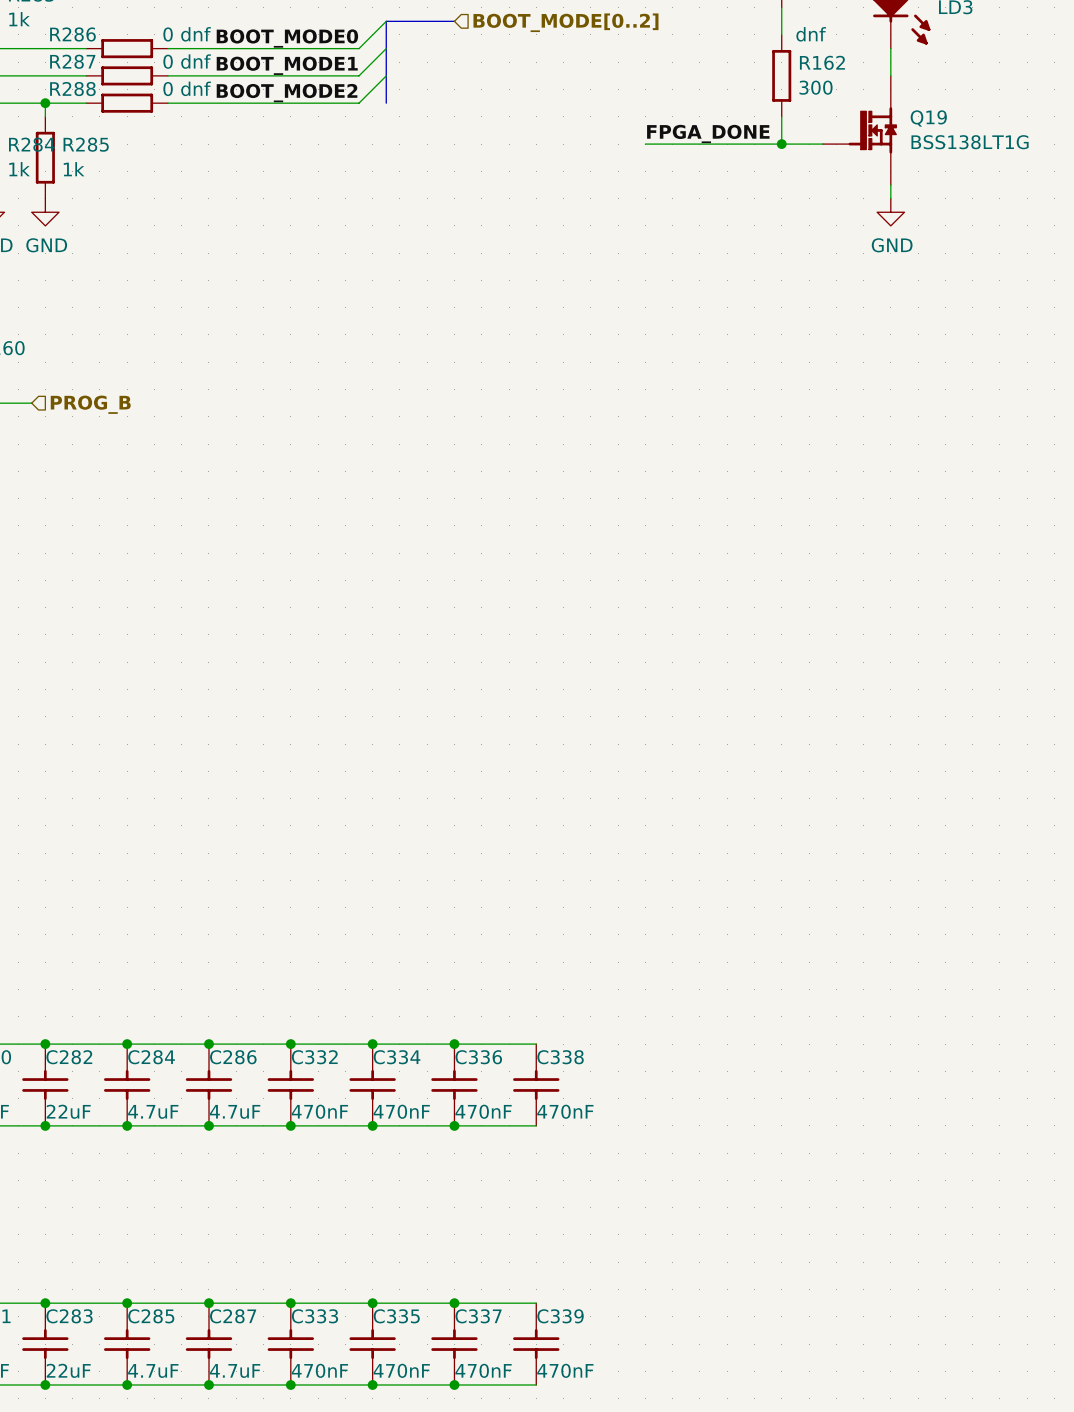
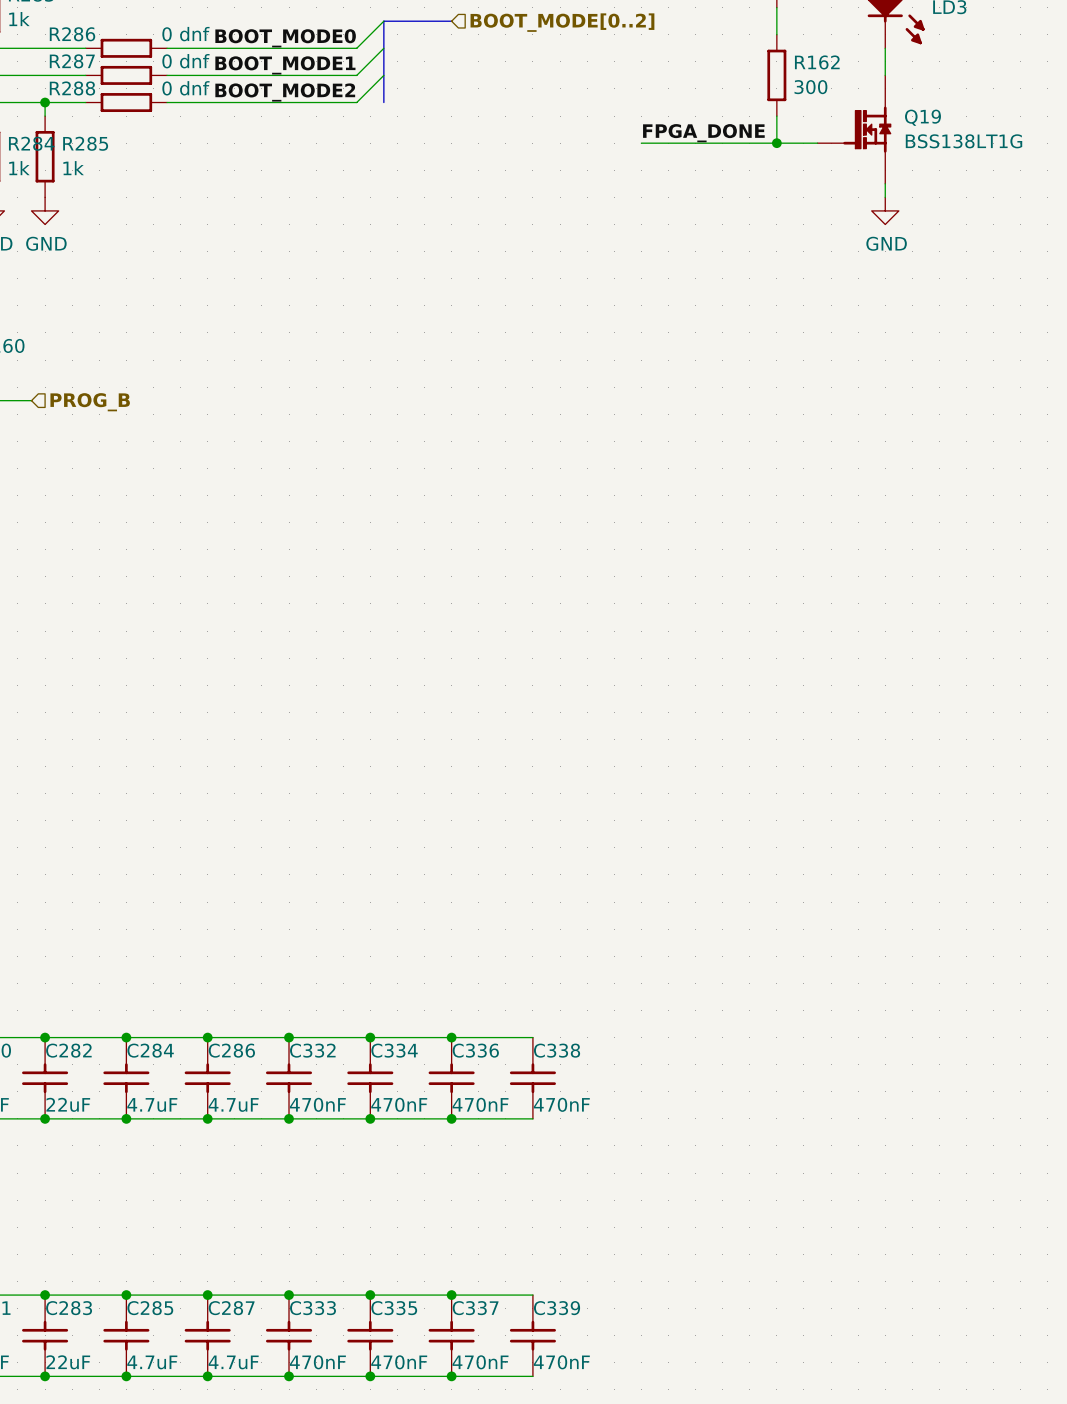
R162 text: dnf (811, 34) -> none

